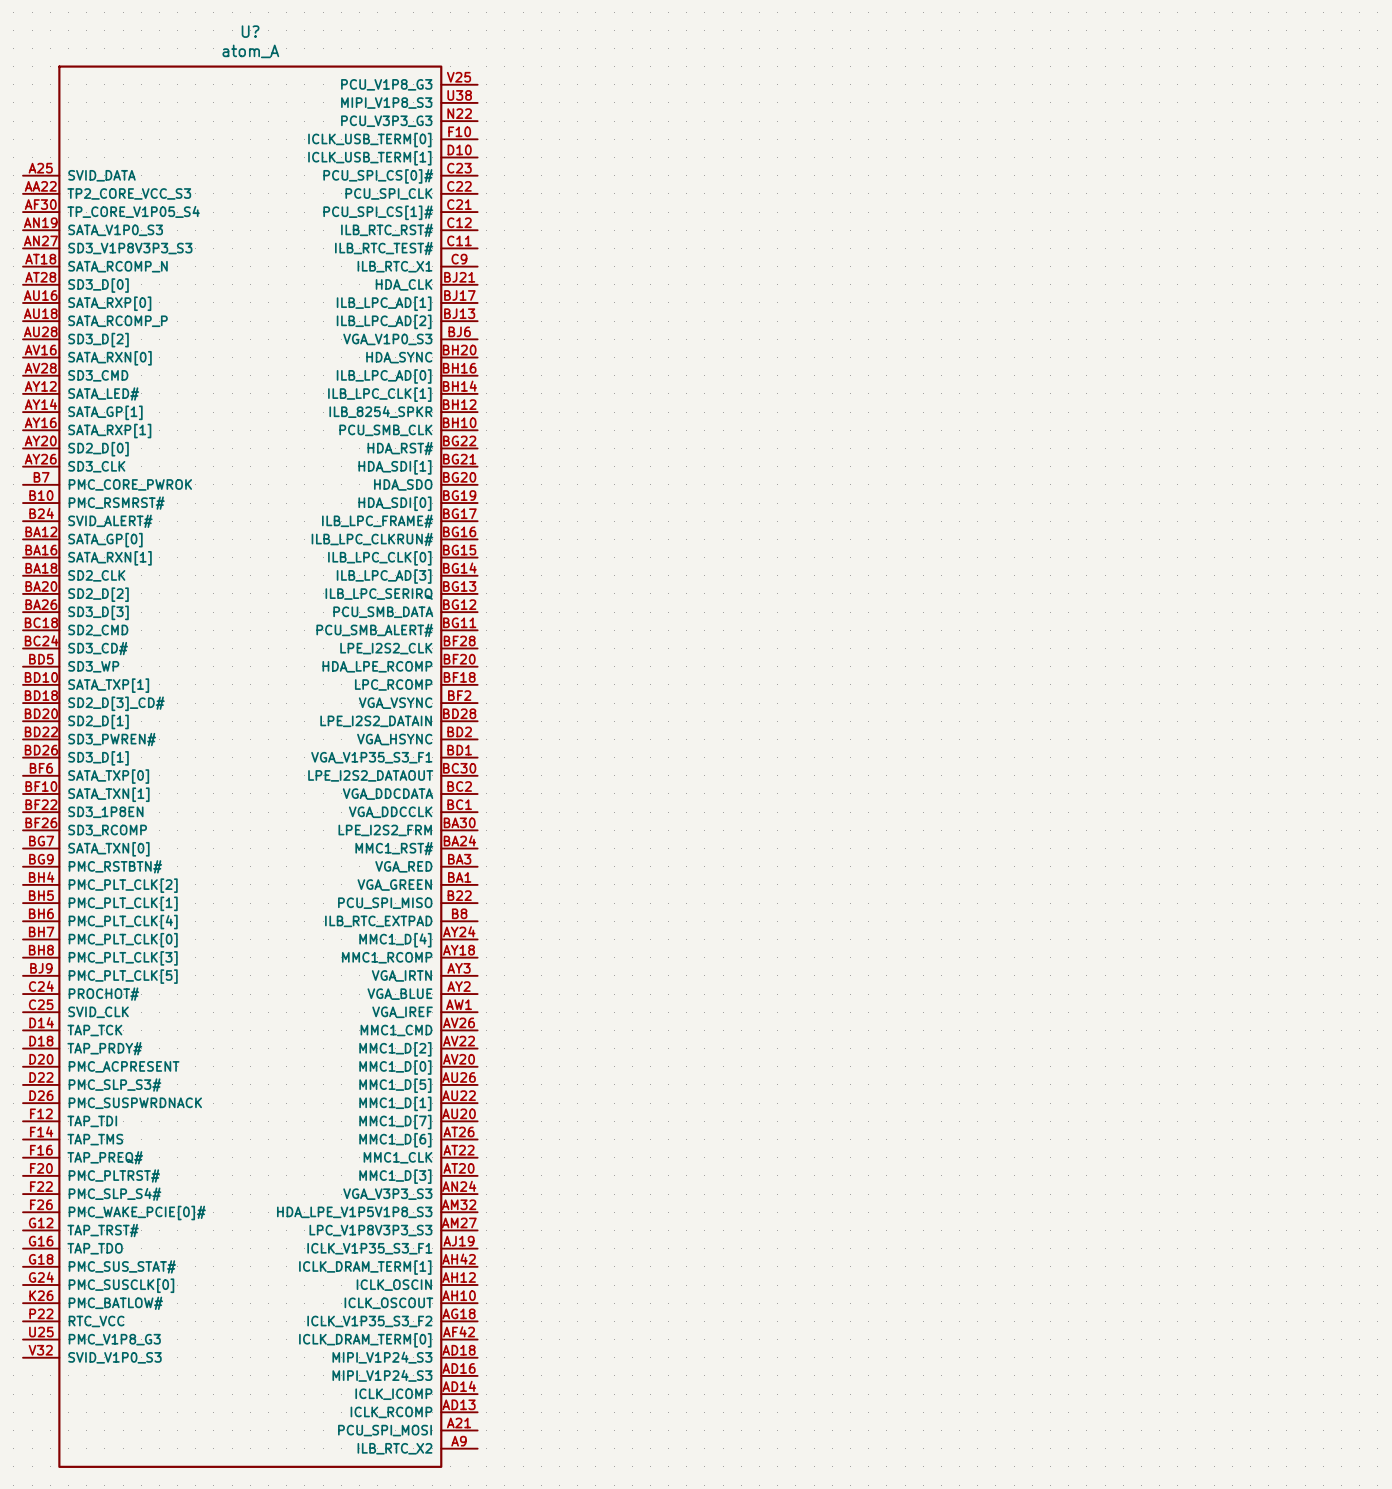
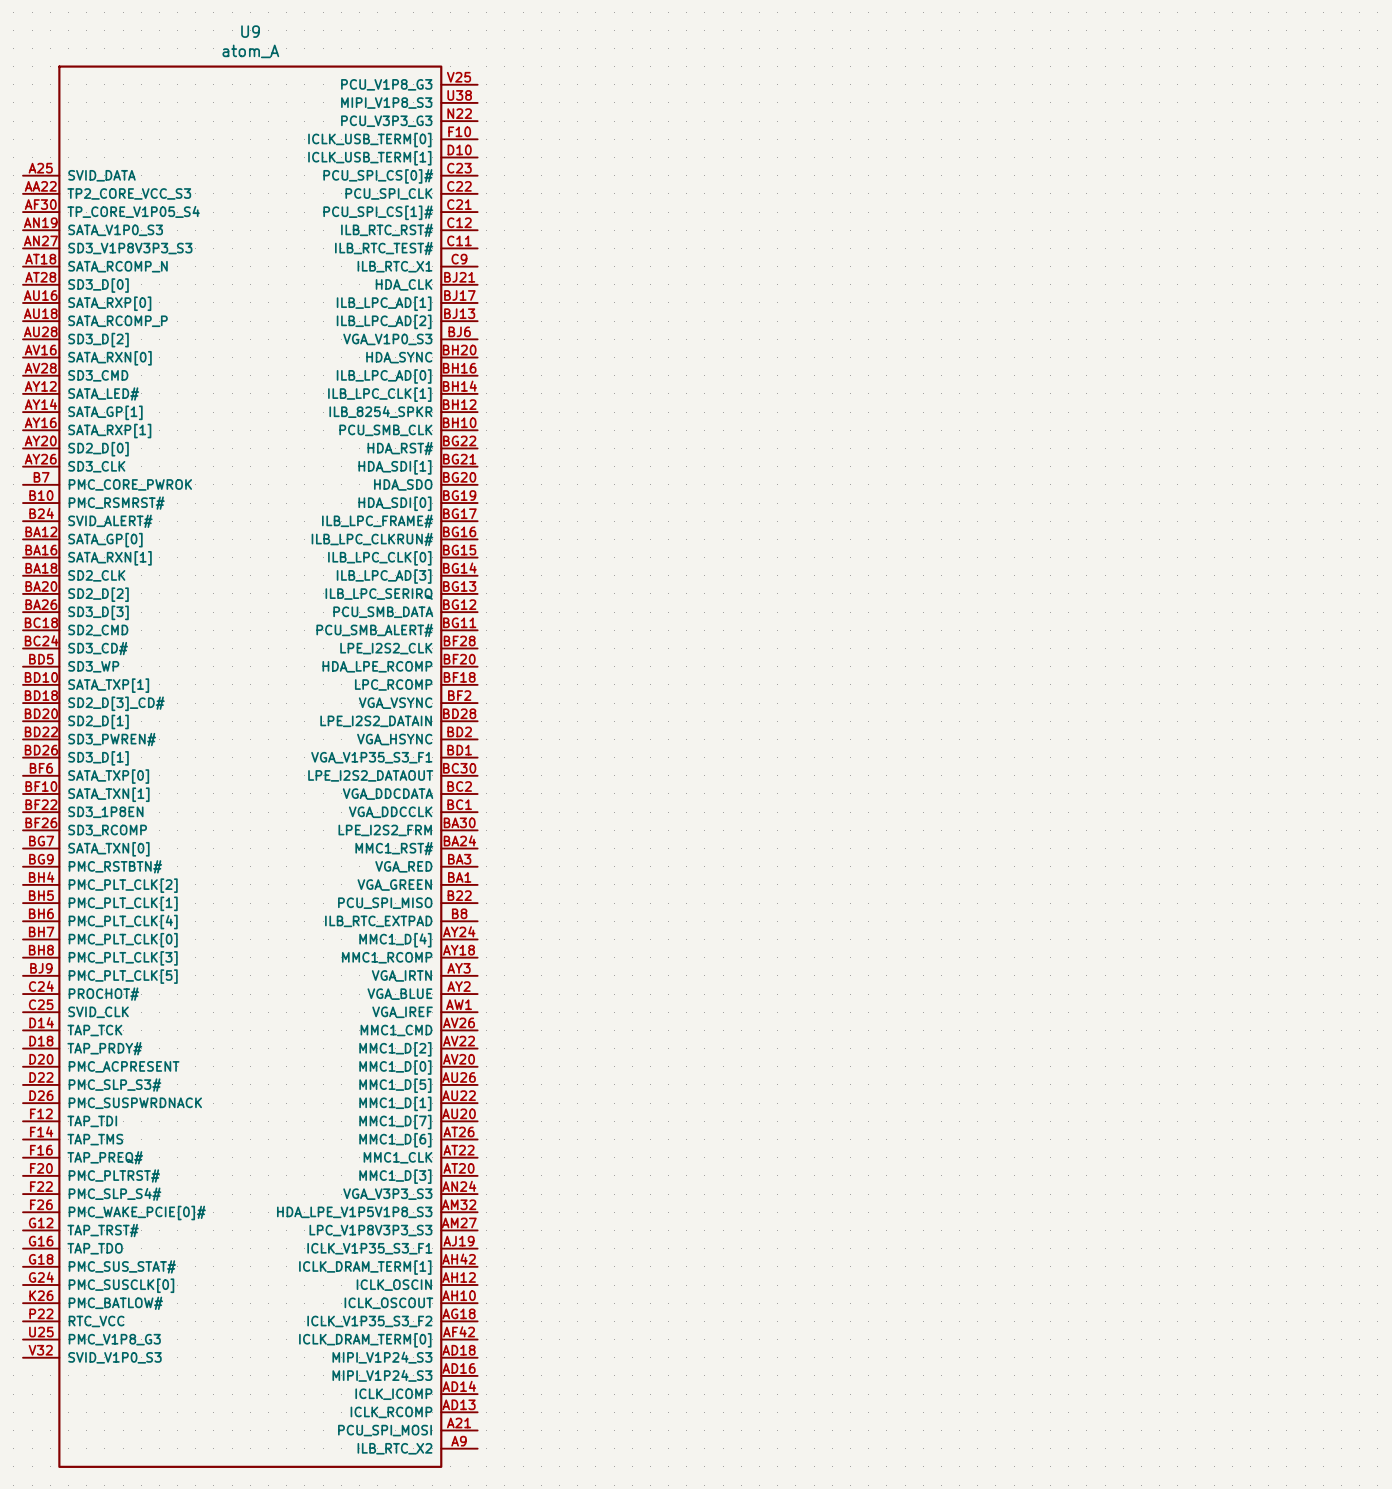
U? name: U? (250, 31) -> U9 (250, 31)

